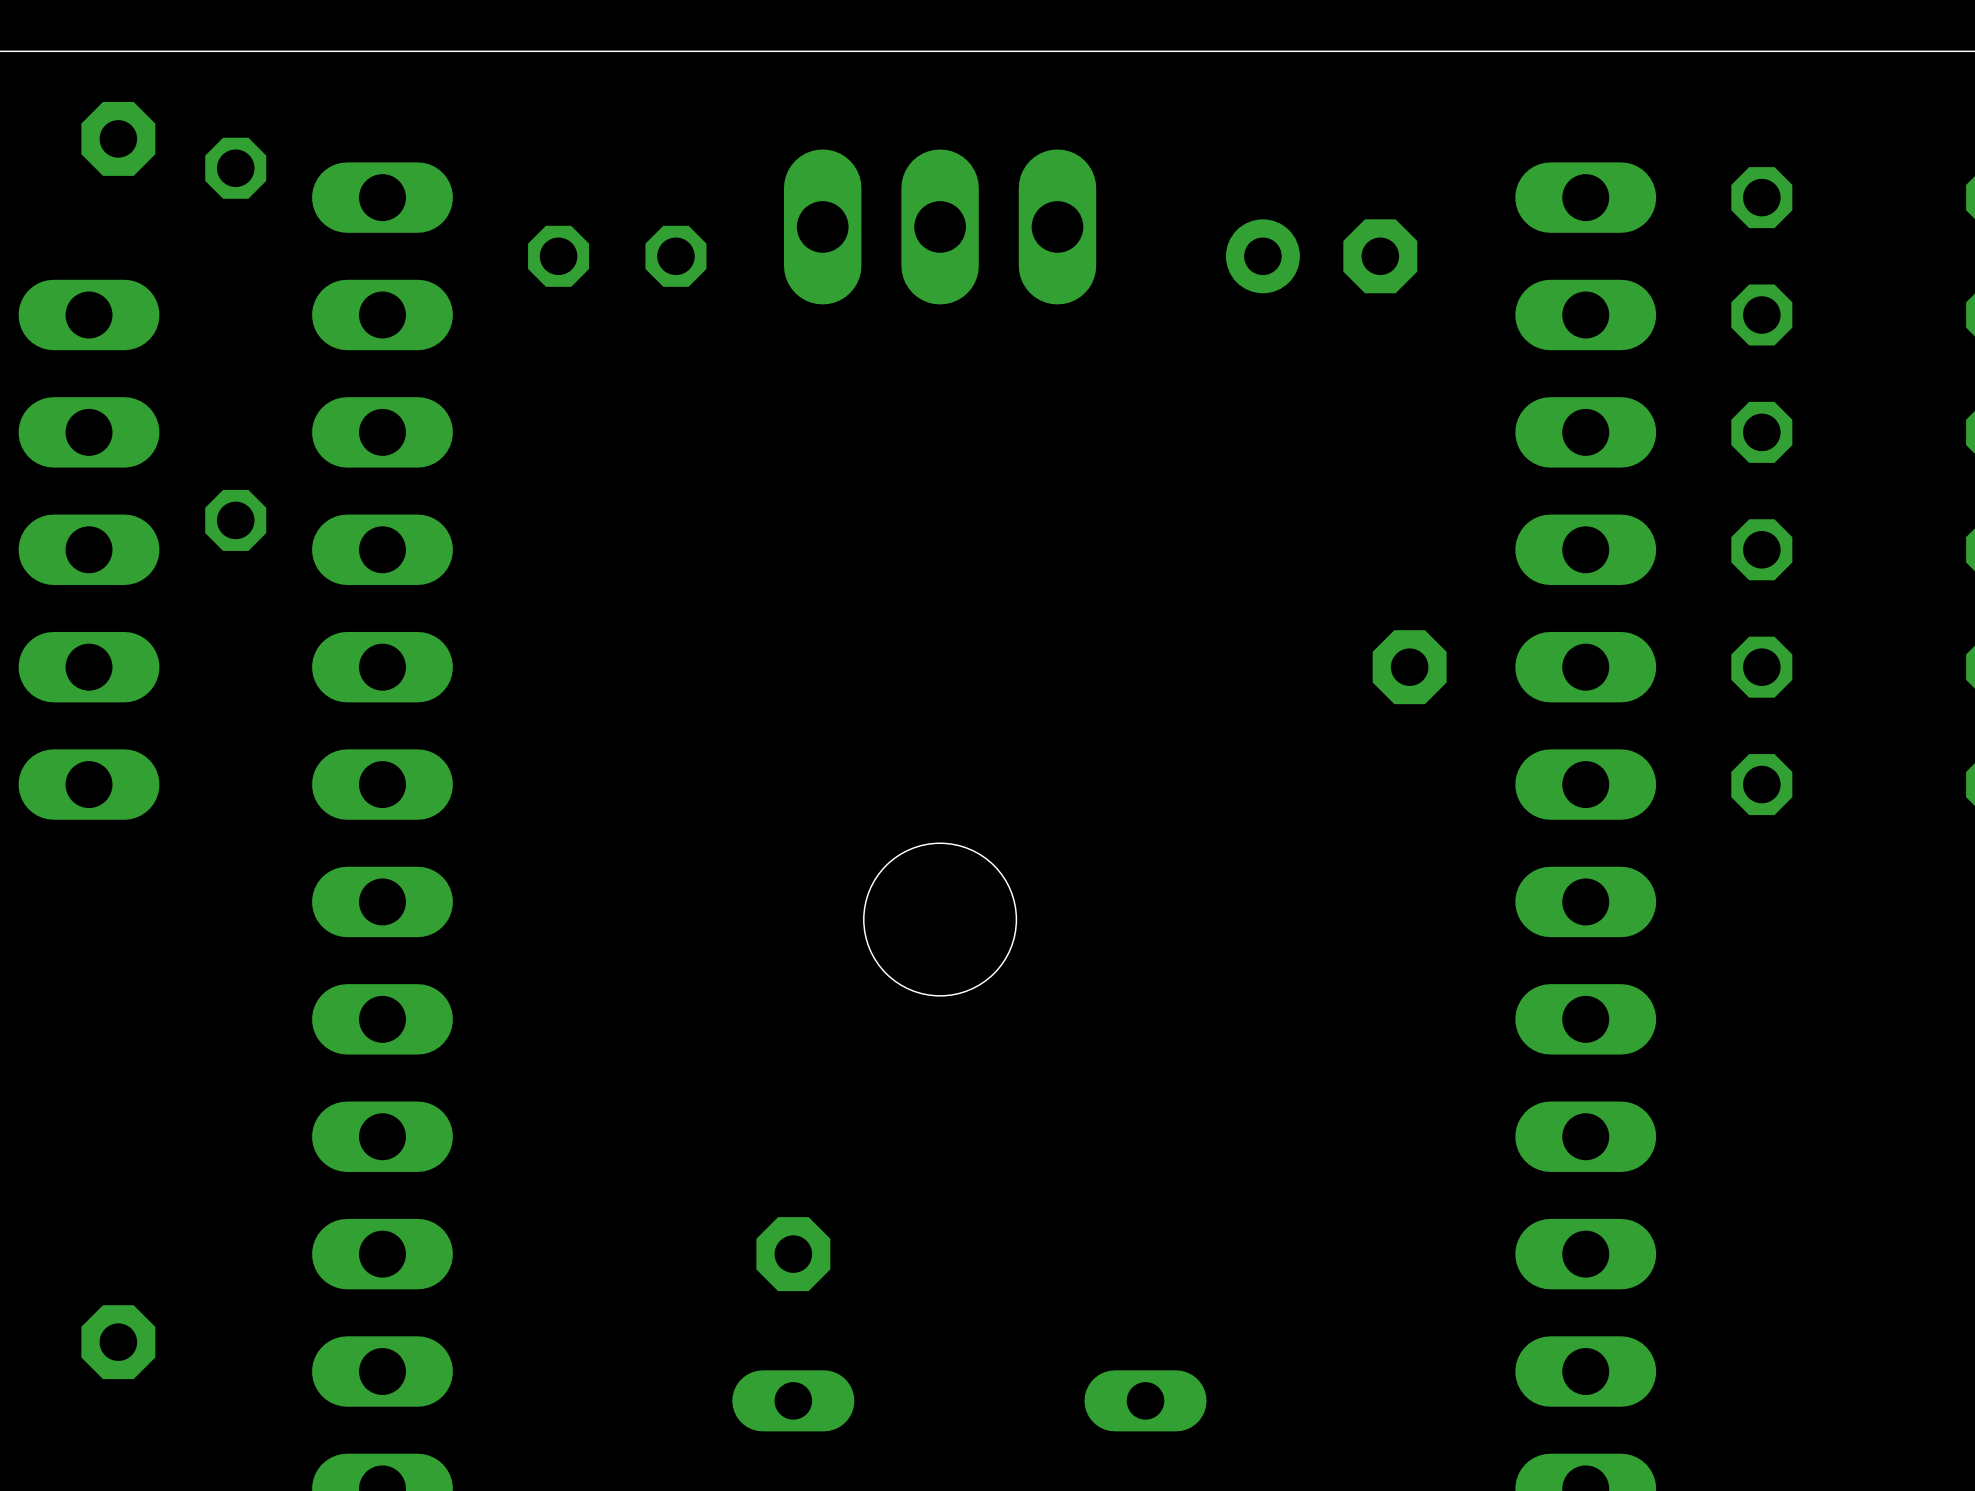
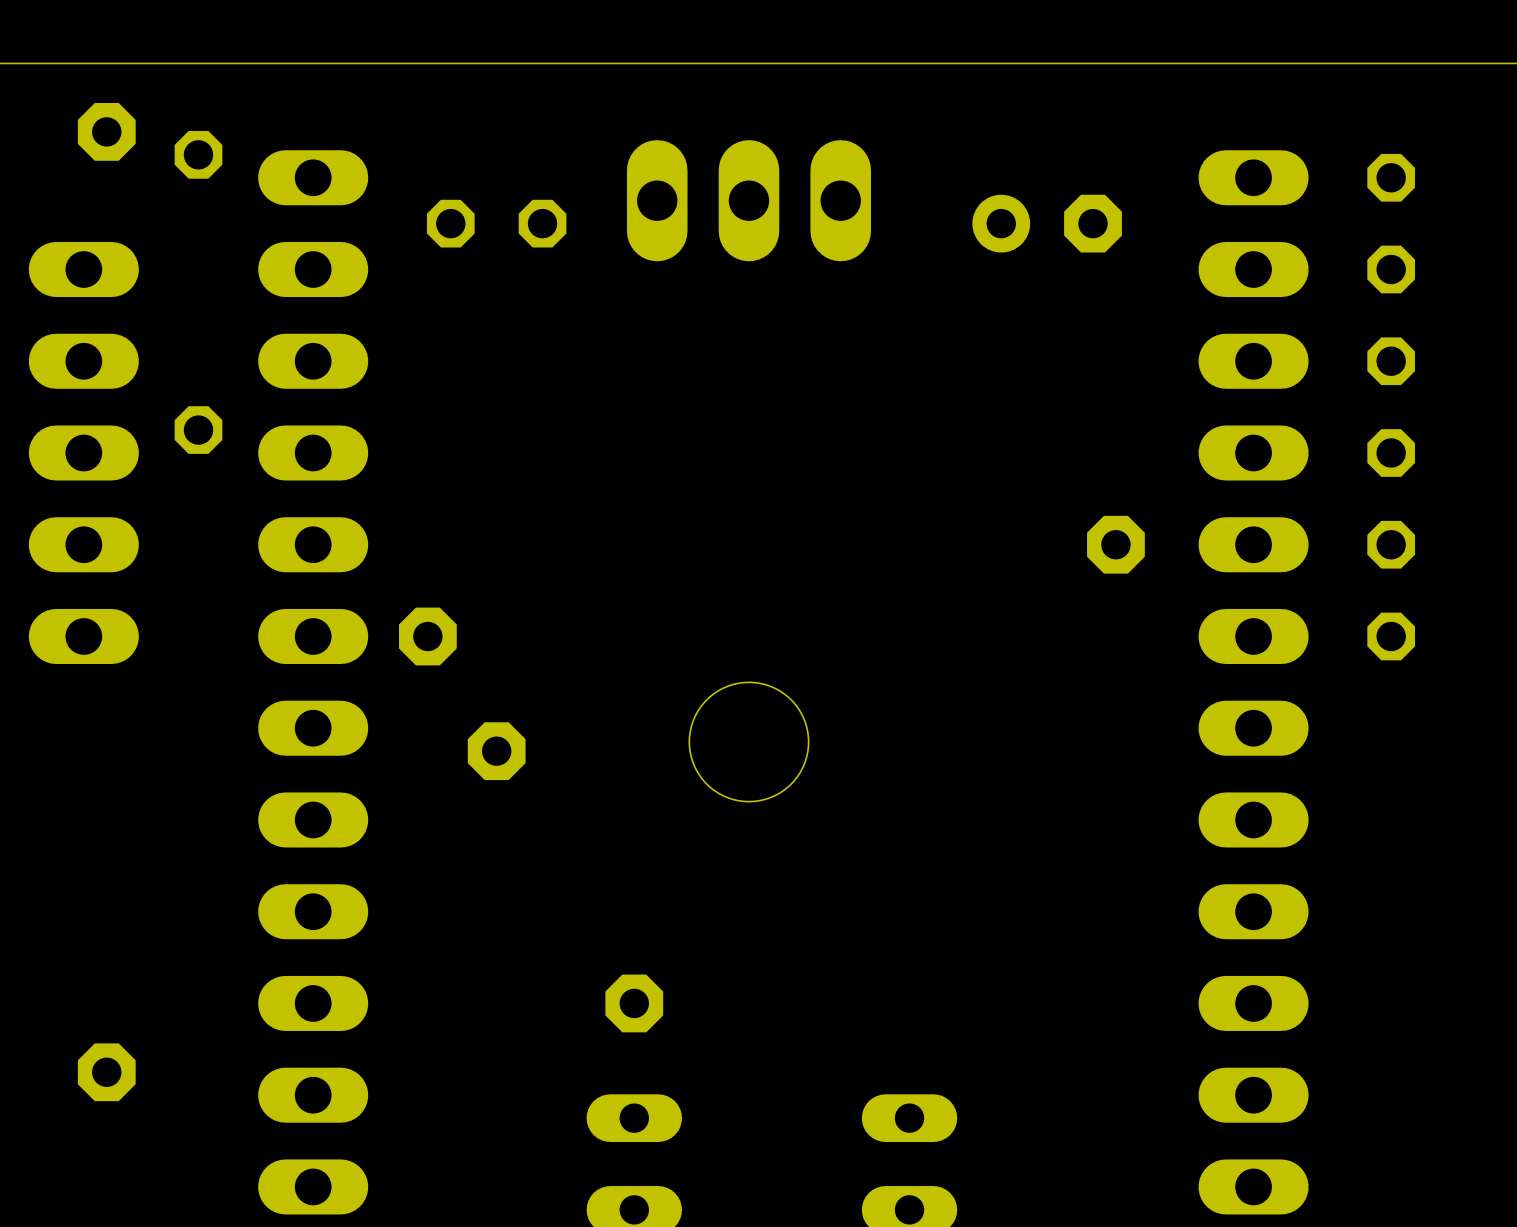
part: none -> (427, 636)
part: none -> (496, 751)

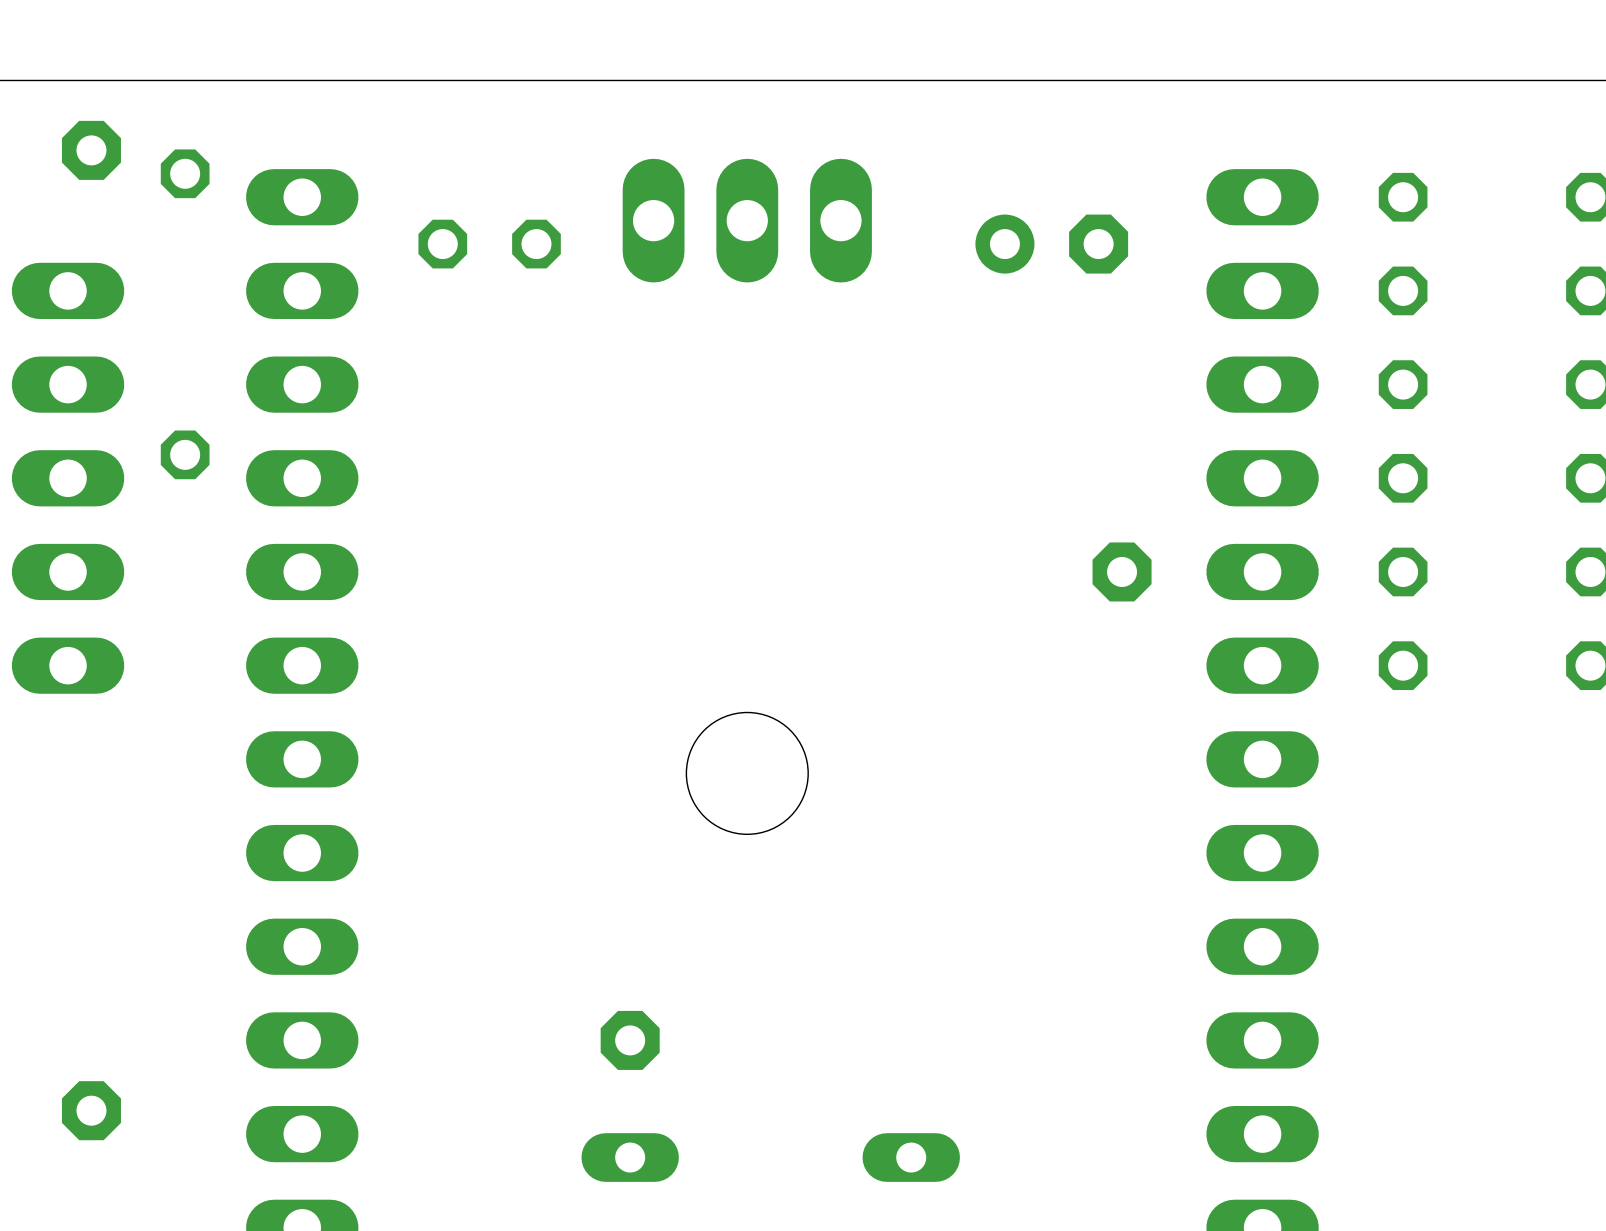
part: (427, 636) -> none
part: (496, 751) -> none

